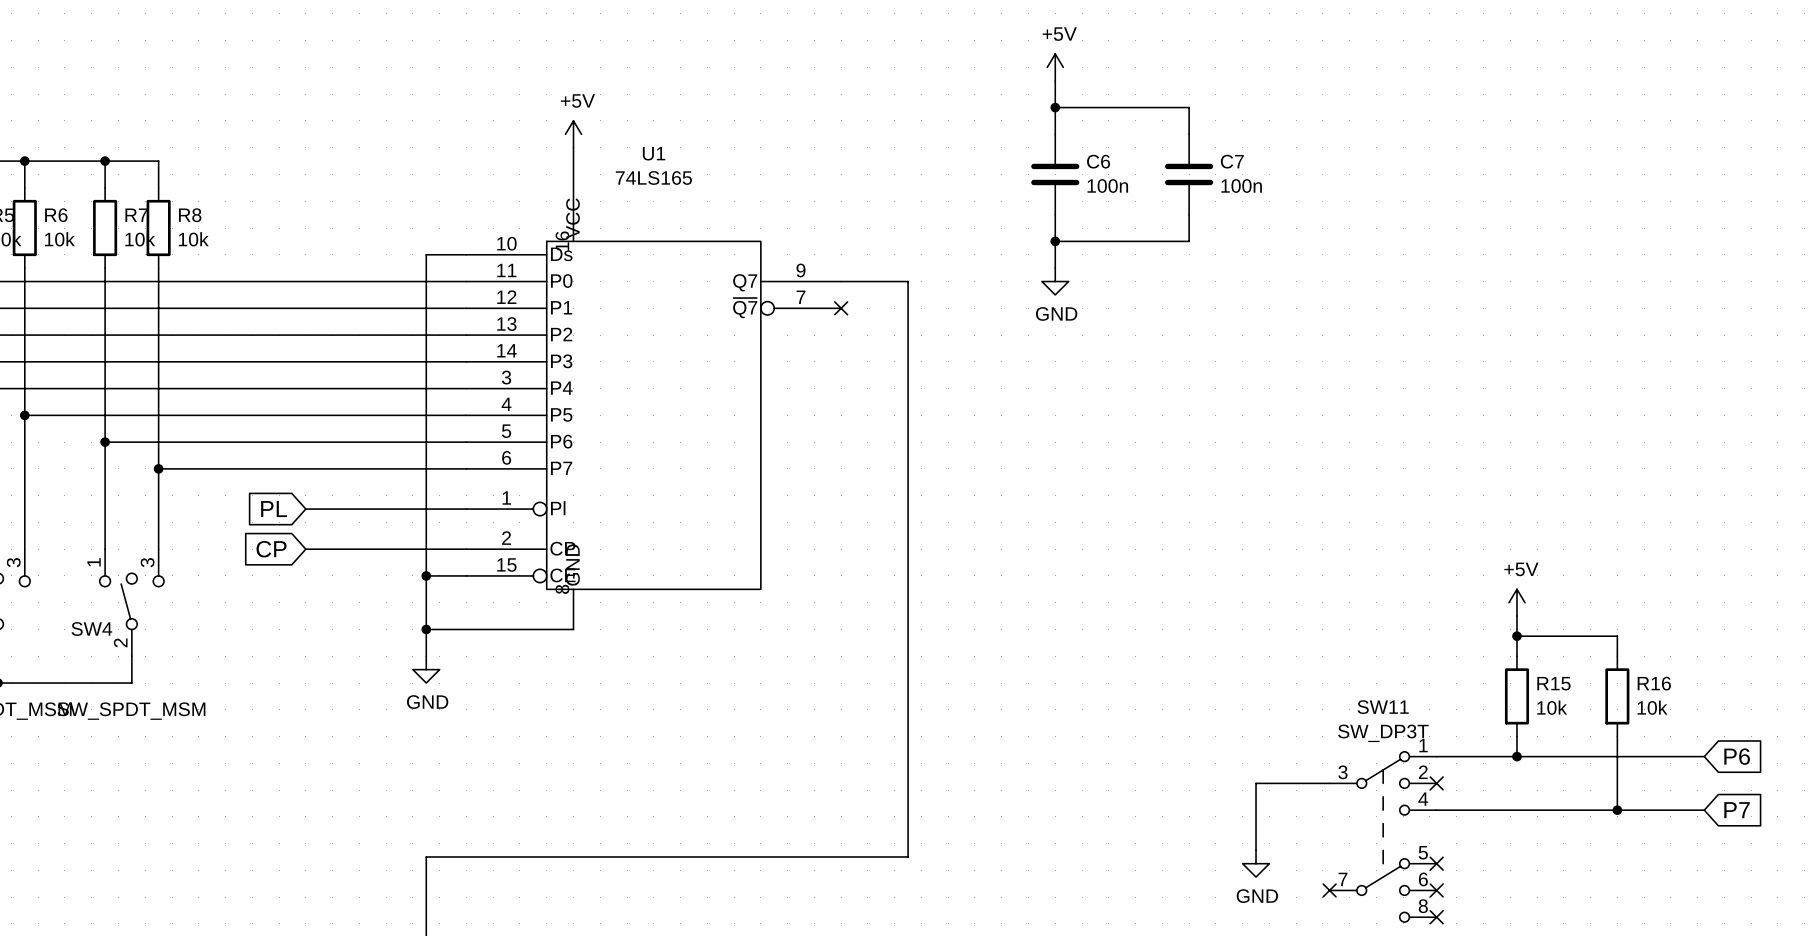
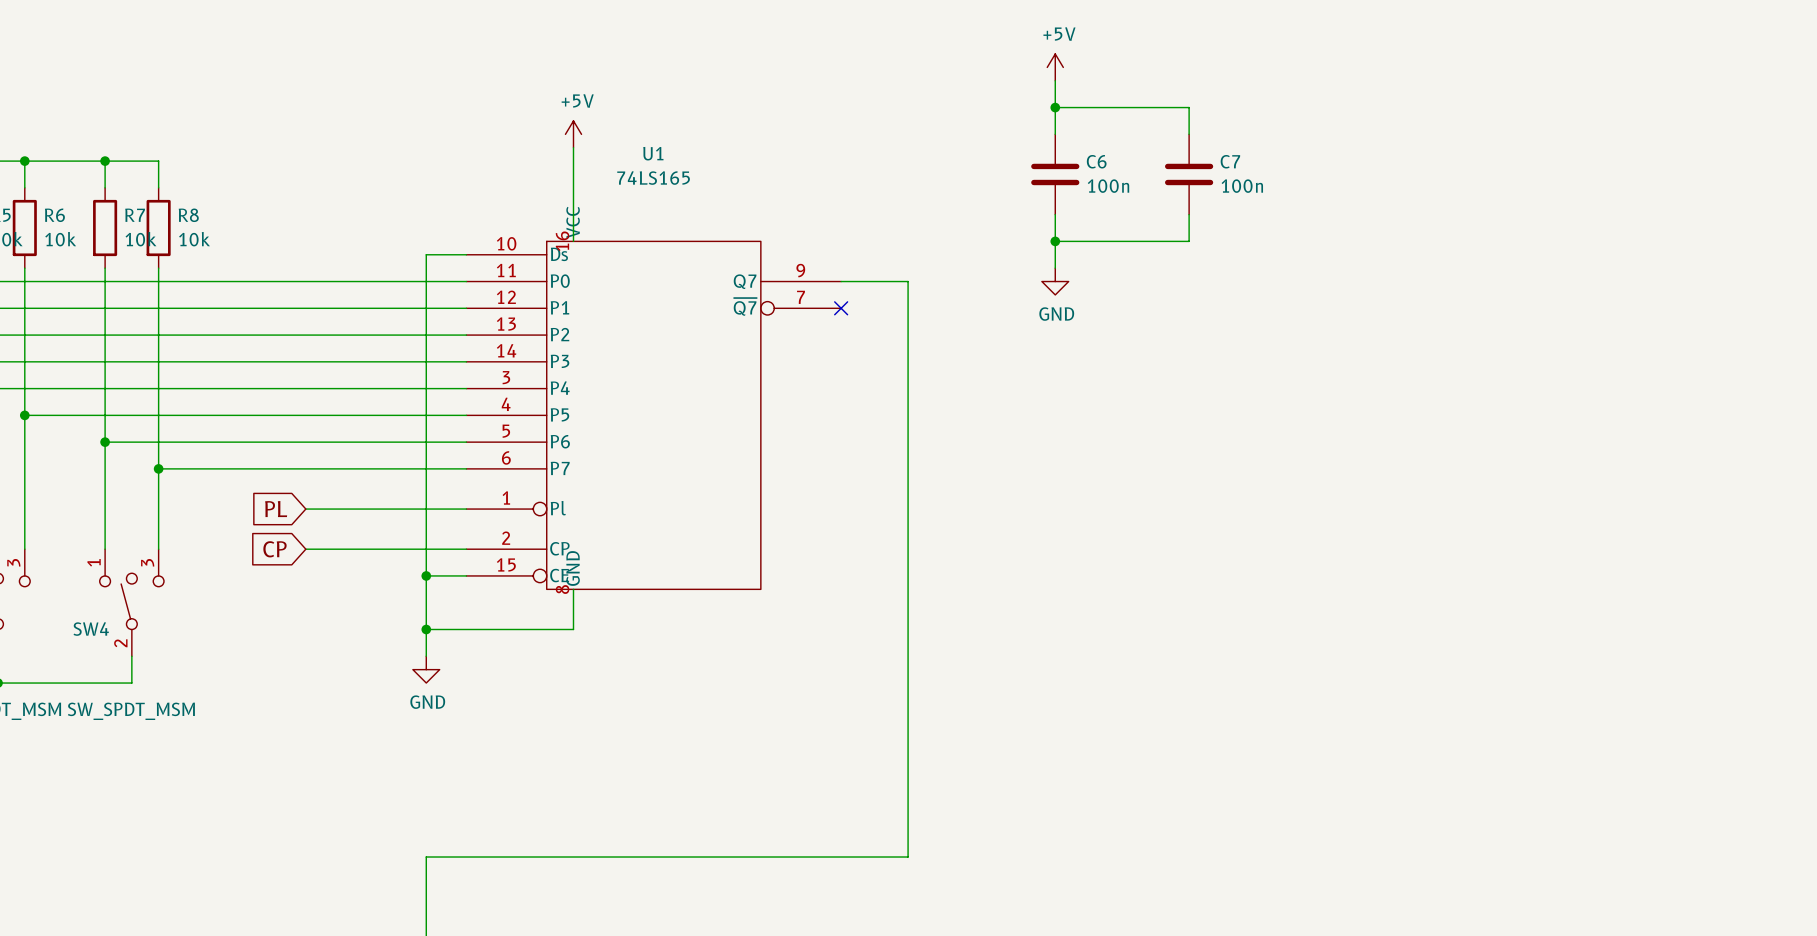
power symbol: +5V (1516, 602) -> none
wire: (1516, 616) (1516, 656) -> none
wire: (1516, 636) (1617, 636) (1617, 656) -> none
junction: (1516, 636) -> none
R15: 10k (1516, 696) -> none
R16: 10k (1617, 696) -> none
wire: (1516, 736) (1516, 756) -> none
wire: (1617, 736) (1617, 810) -> none
wire: (1436, 756) (1704, 756) -> none
junction: (1516, 756) -> none
global label: P6 (1737, 756) -> none
wire: (1329, 783) (1256, 783) (1256, 850) -> none
no-connect mark: (1436, 783) -> none
wire: (1436, 810) (1704, 810) -> none
junction: (1617, 810) -> none
global label: P7 (1737, 810) -> none
SW11: SW_DP3T (1383, 836) -> none
power symbol: GND (1256, 863) -> none
no-connect mark: (1436, 863) -> none
no-connect mark: (1329, 890) -> none
no-connect mark: (1436, 890) -> none
no-connect mark: (1436, 917) -> none

